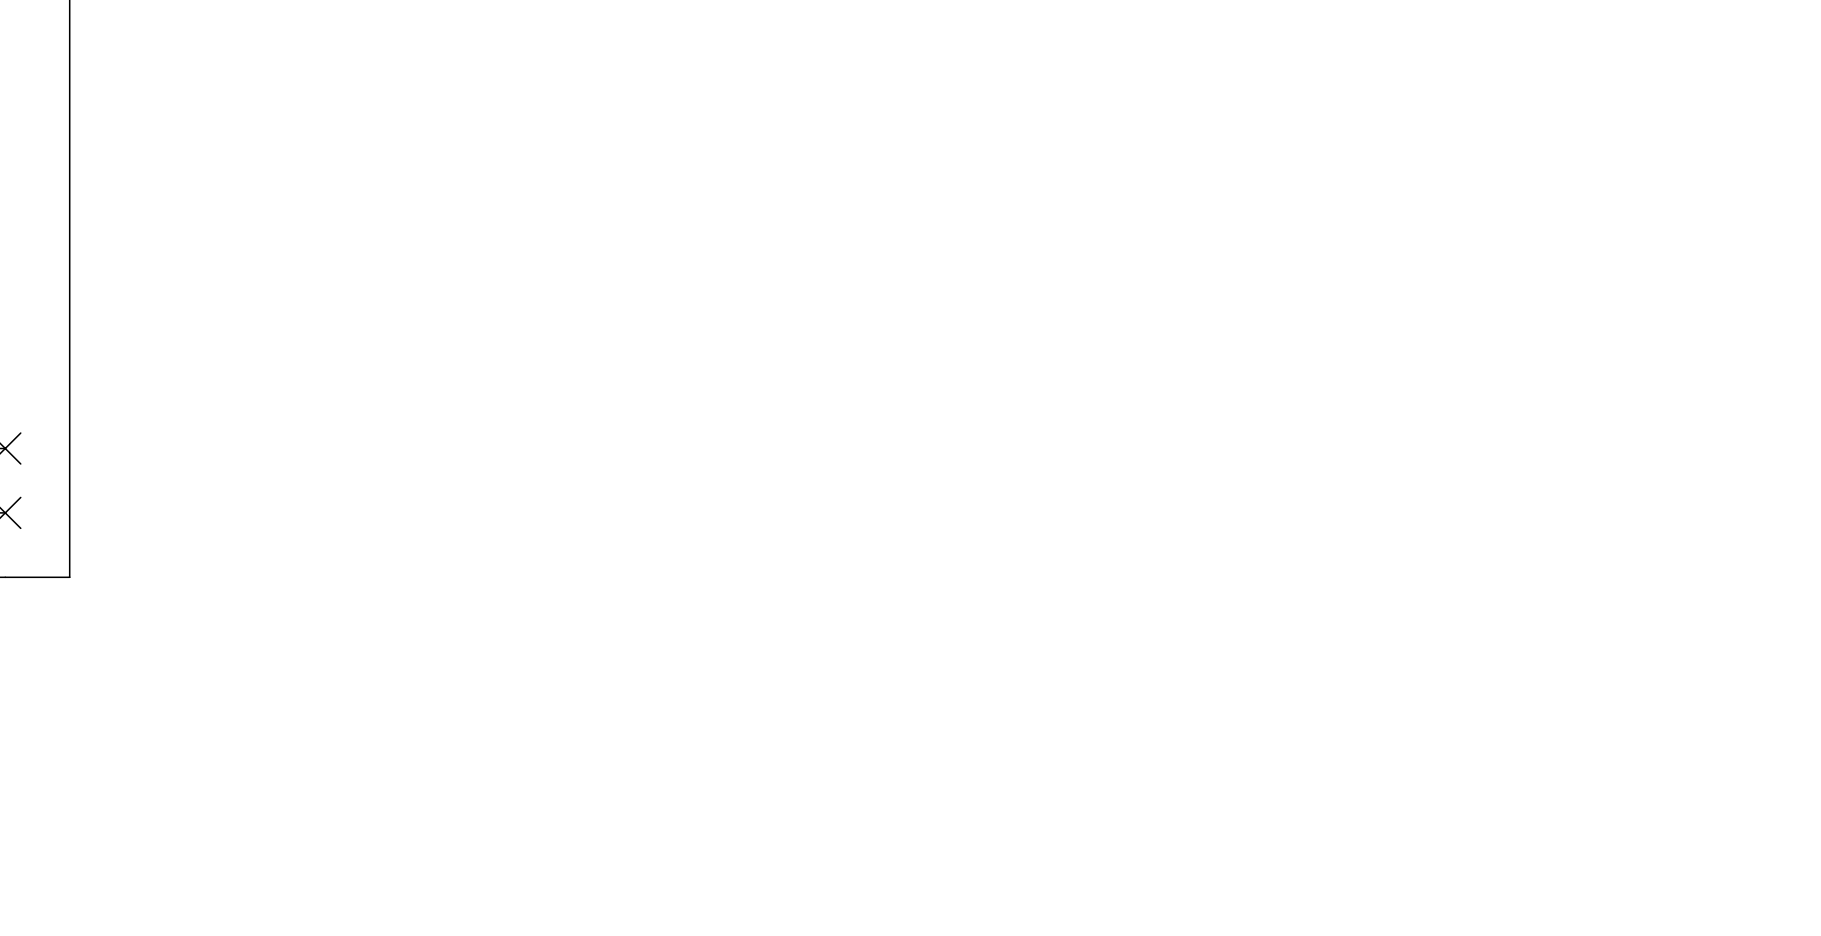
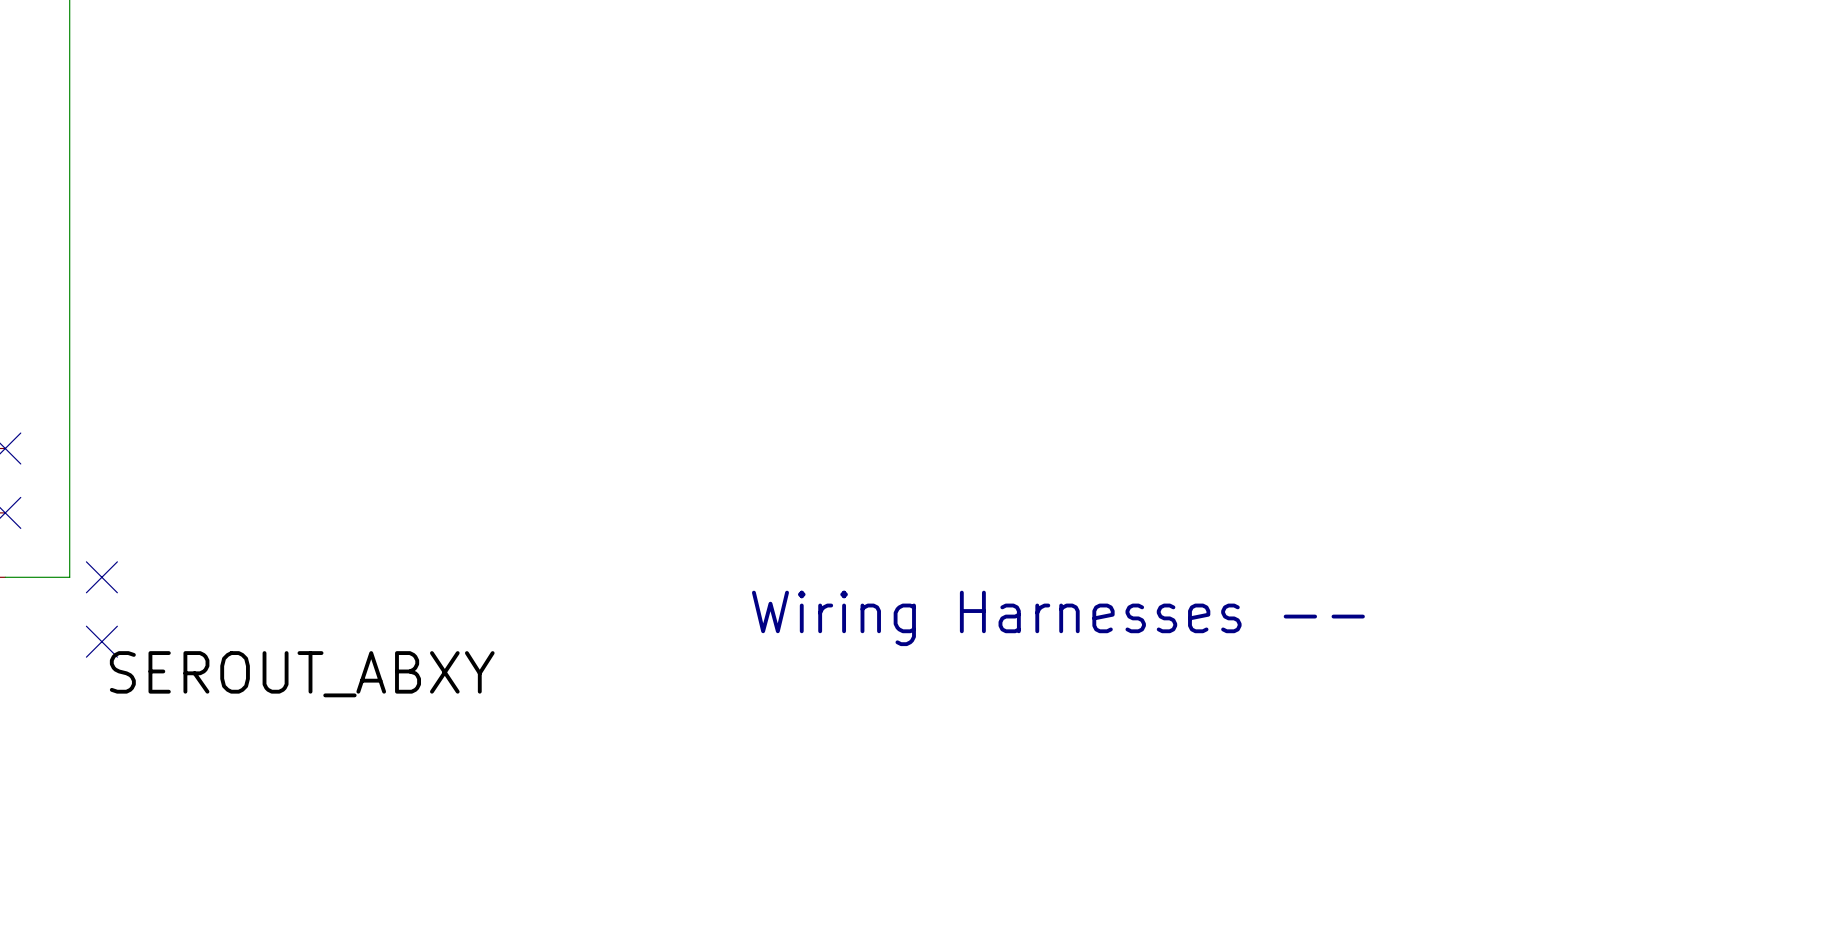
no-connect mark: none -> (101, 577)
text: none -> Wiring Harnesses -- (1058, 618)
no-connect mark: none -> (101, 641)
label: none -> SEROUT_ABXY (302, 674)

